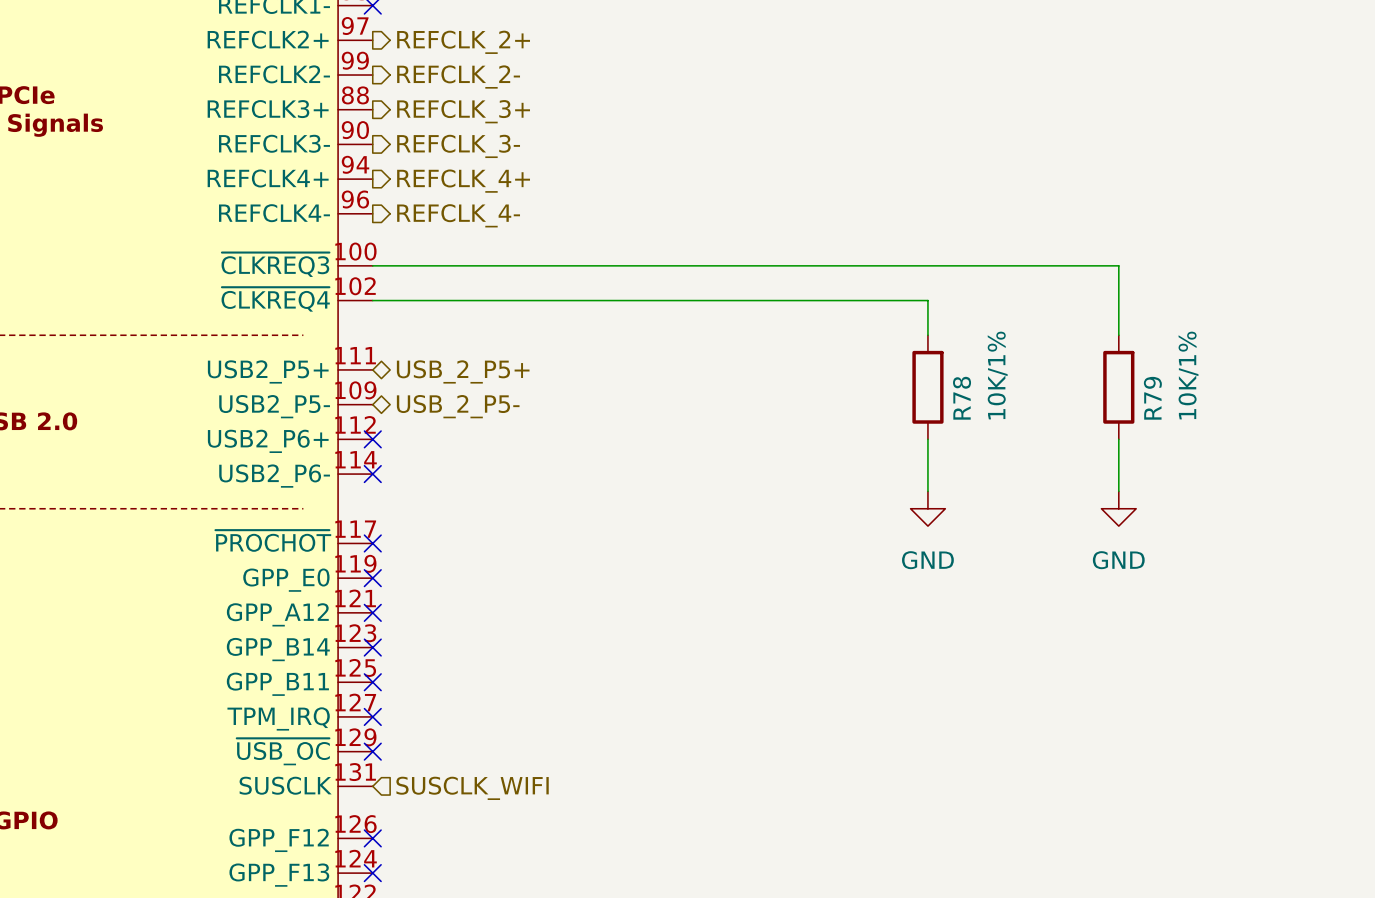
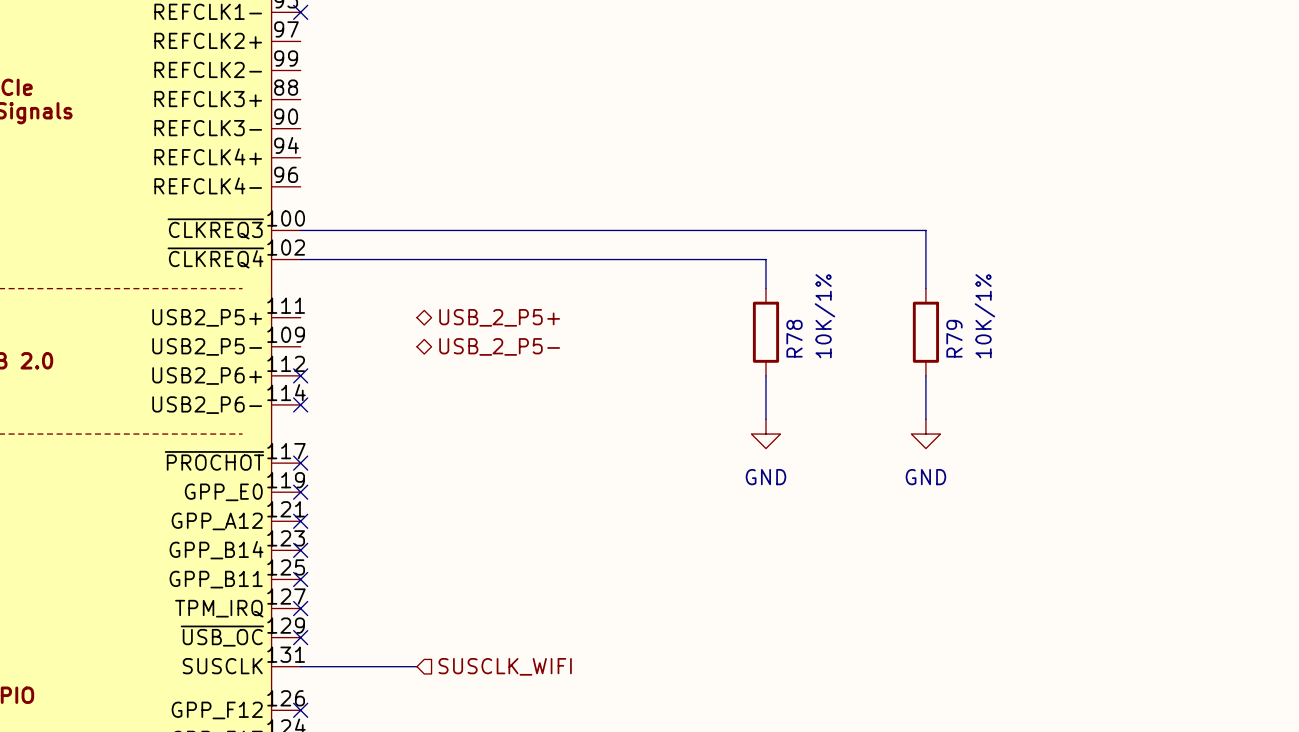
hierarchical label: REFCLK_2+ (463, 42) -> none
hierarchical label: REFCLK_2- (458, 77) -> none
hierarchical label: REFCLK_3+ (463, 111) -> none
hierarchical label: REFCLK_3- (458, 146) -> none
hierarchical label: REFCLK_4+ (463, 181) -> none
hierarchical label: REFCLK_4- (458, 215) -> none
hierarchical label position: USB_2_P5+ (463, 371) -> USB_2_P5+ (499, 317)
hierarchical label position: USB_2_P5- (458, 406) -> USB_2_P5- (499, 346)
wire: none -> (300, 666) (417, 666)
hierarchical label position: SUSCLK_WIFI (472, 788) -> SUSCLK_WIFI (505, 666)

